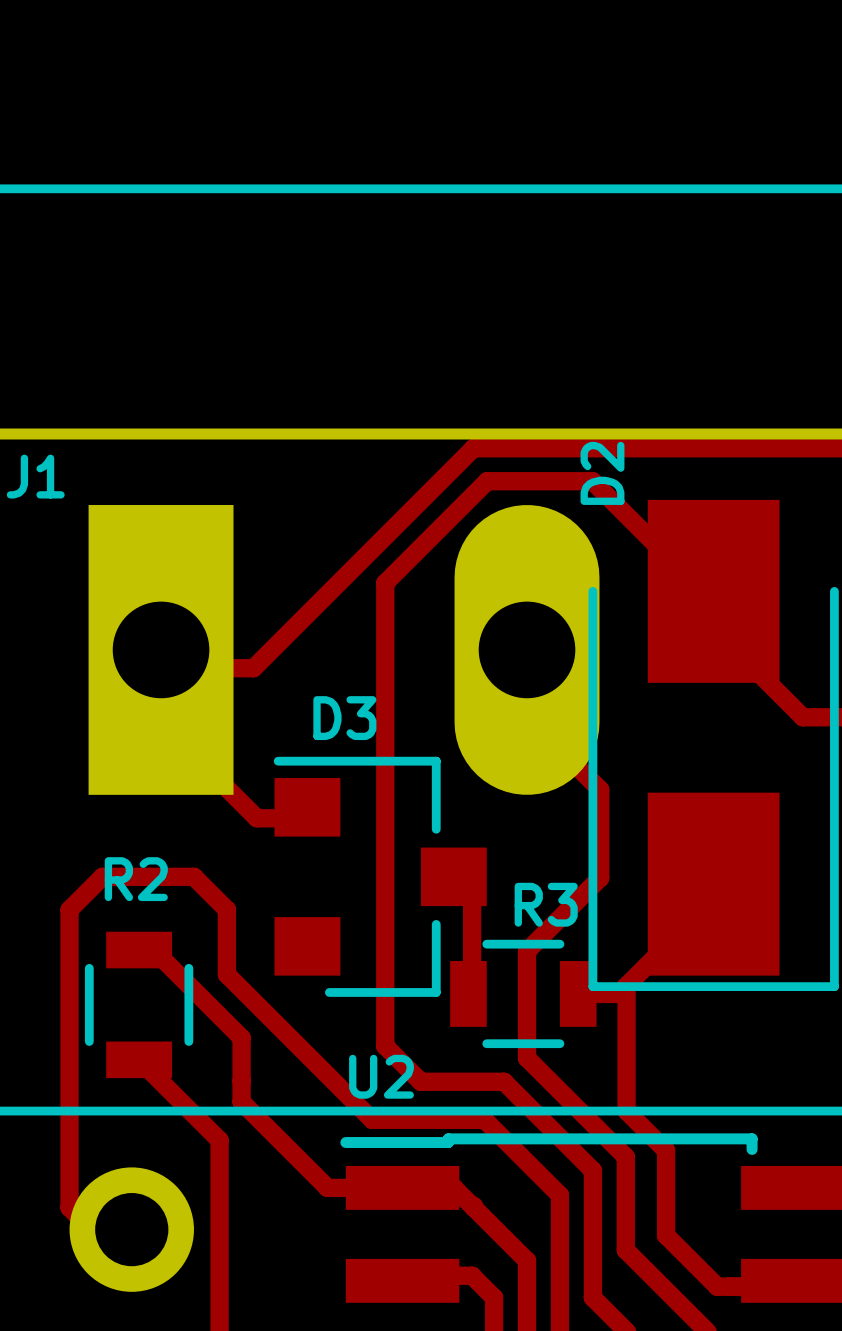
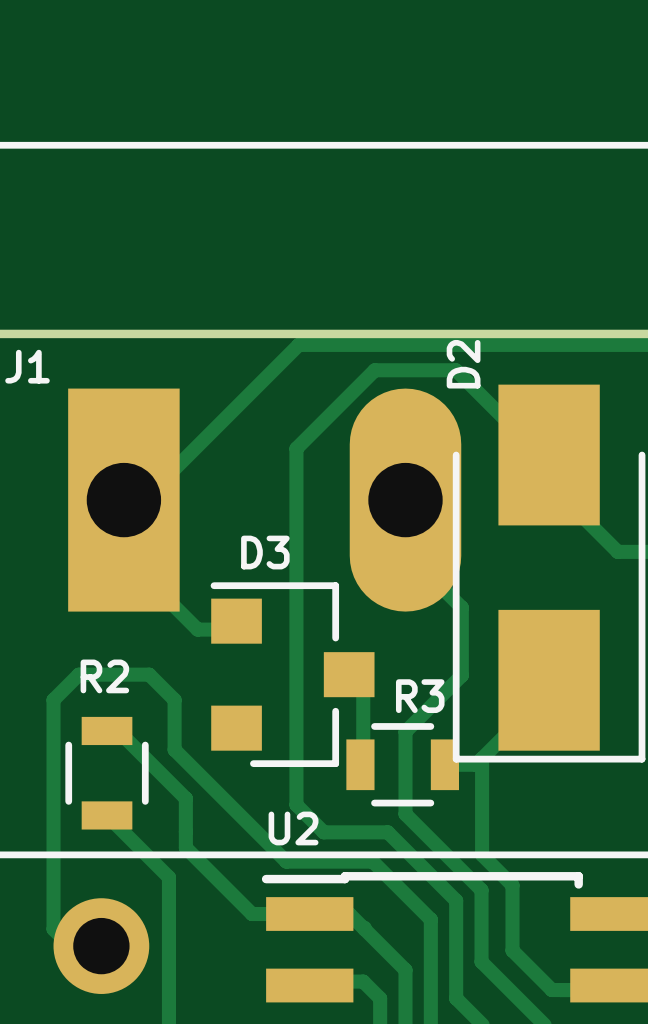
track: (473, 448) (253, 668) (168, 668) -> (364, 344) (298, 344) (129, 514)

